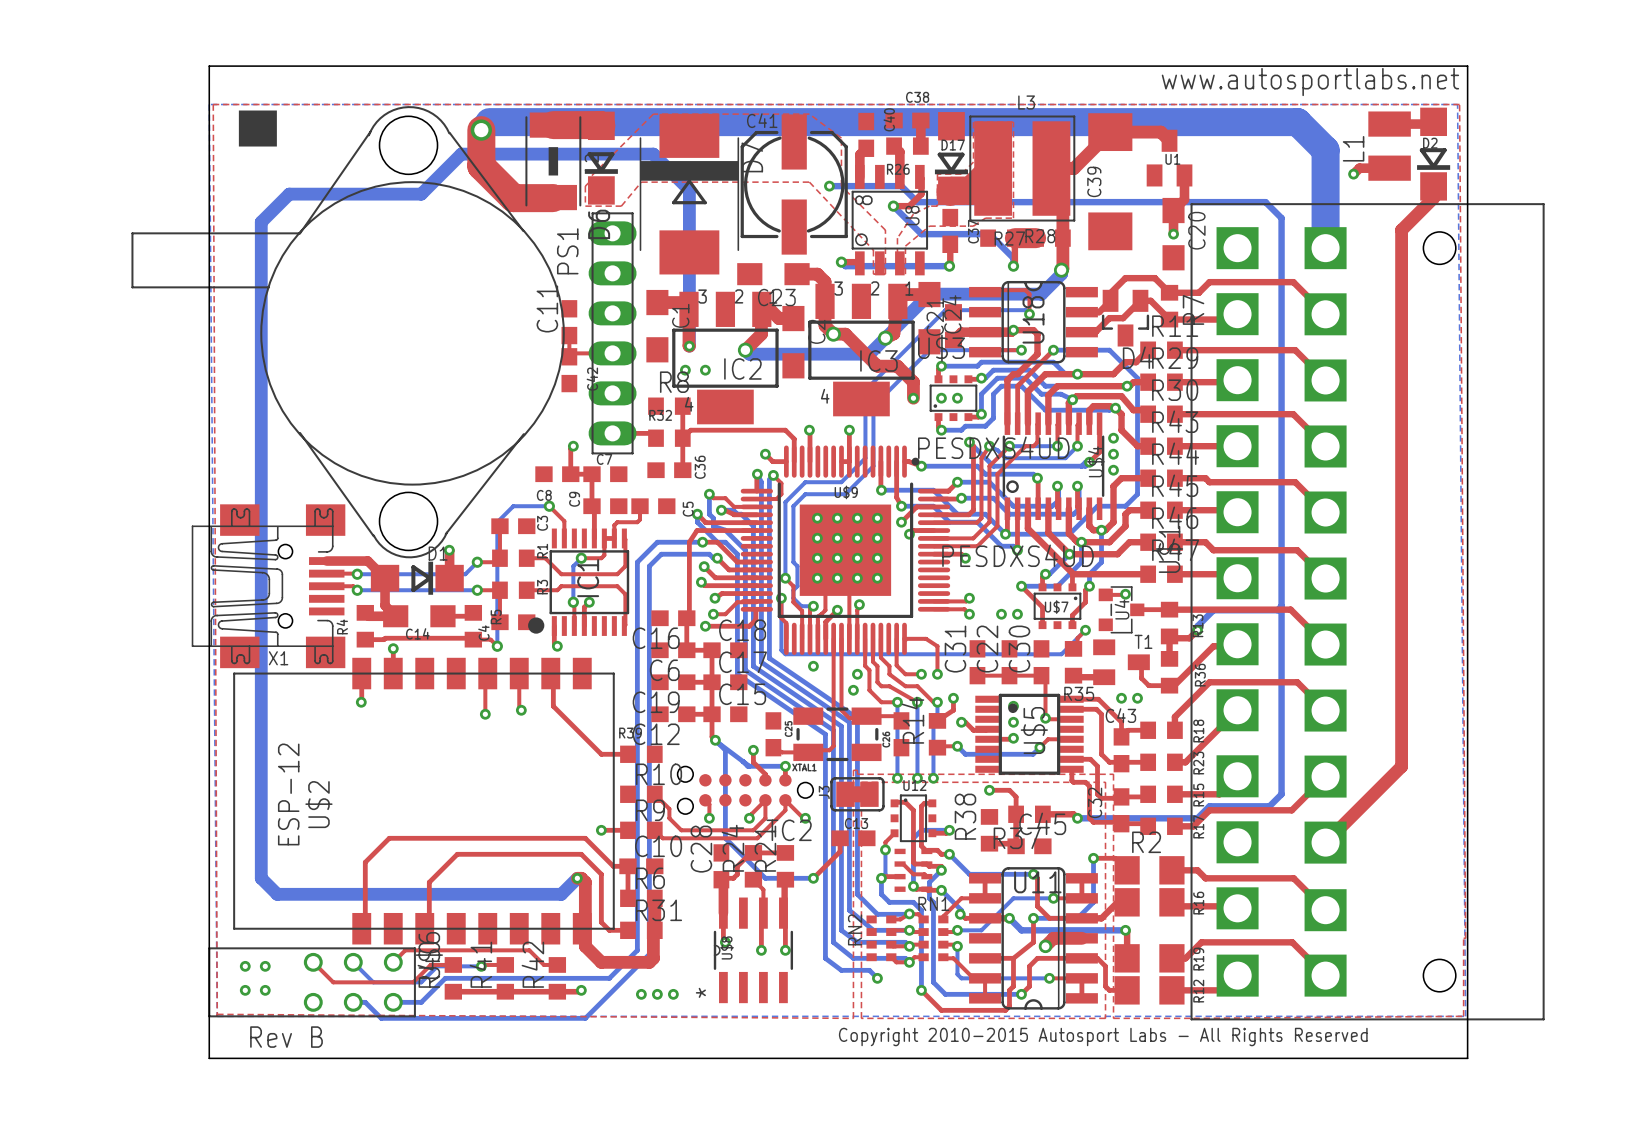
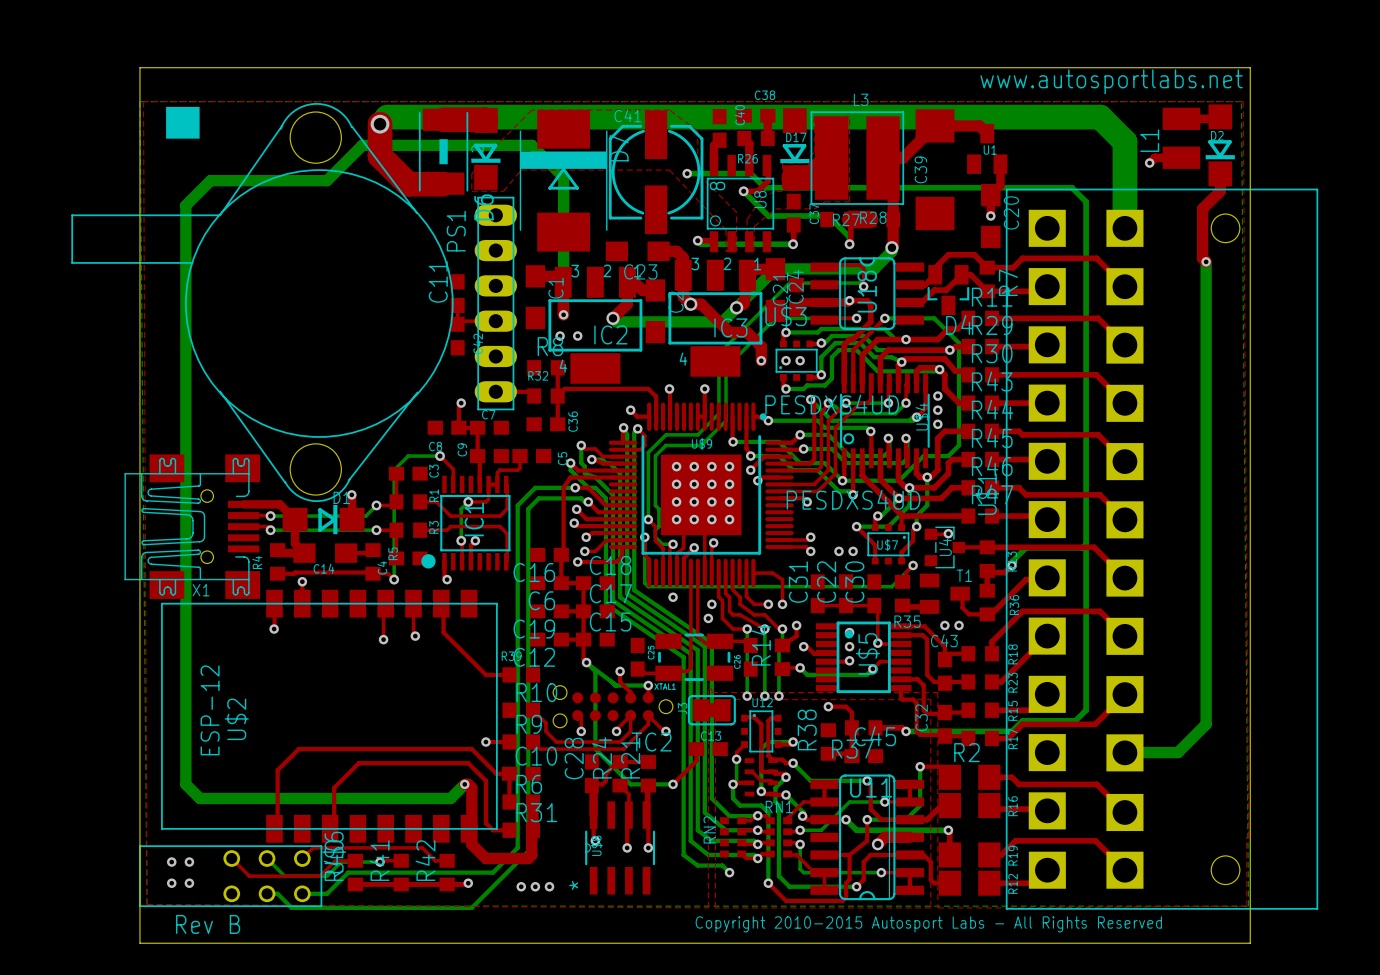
top track: (1433, 198) (1401, 230) (1401, 766) (1325, 842) -> (1220, 184) (1220, 191) (1202, 208) (1202, 258) (1206, 261)
bottom track: none -> (1206, 261) (1206, 724) (1177, 752) (1125, 752)
via: none -> (1206, 261)

